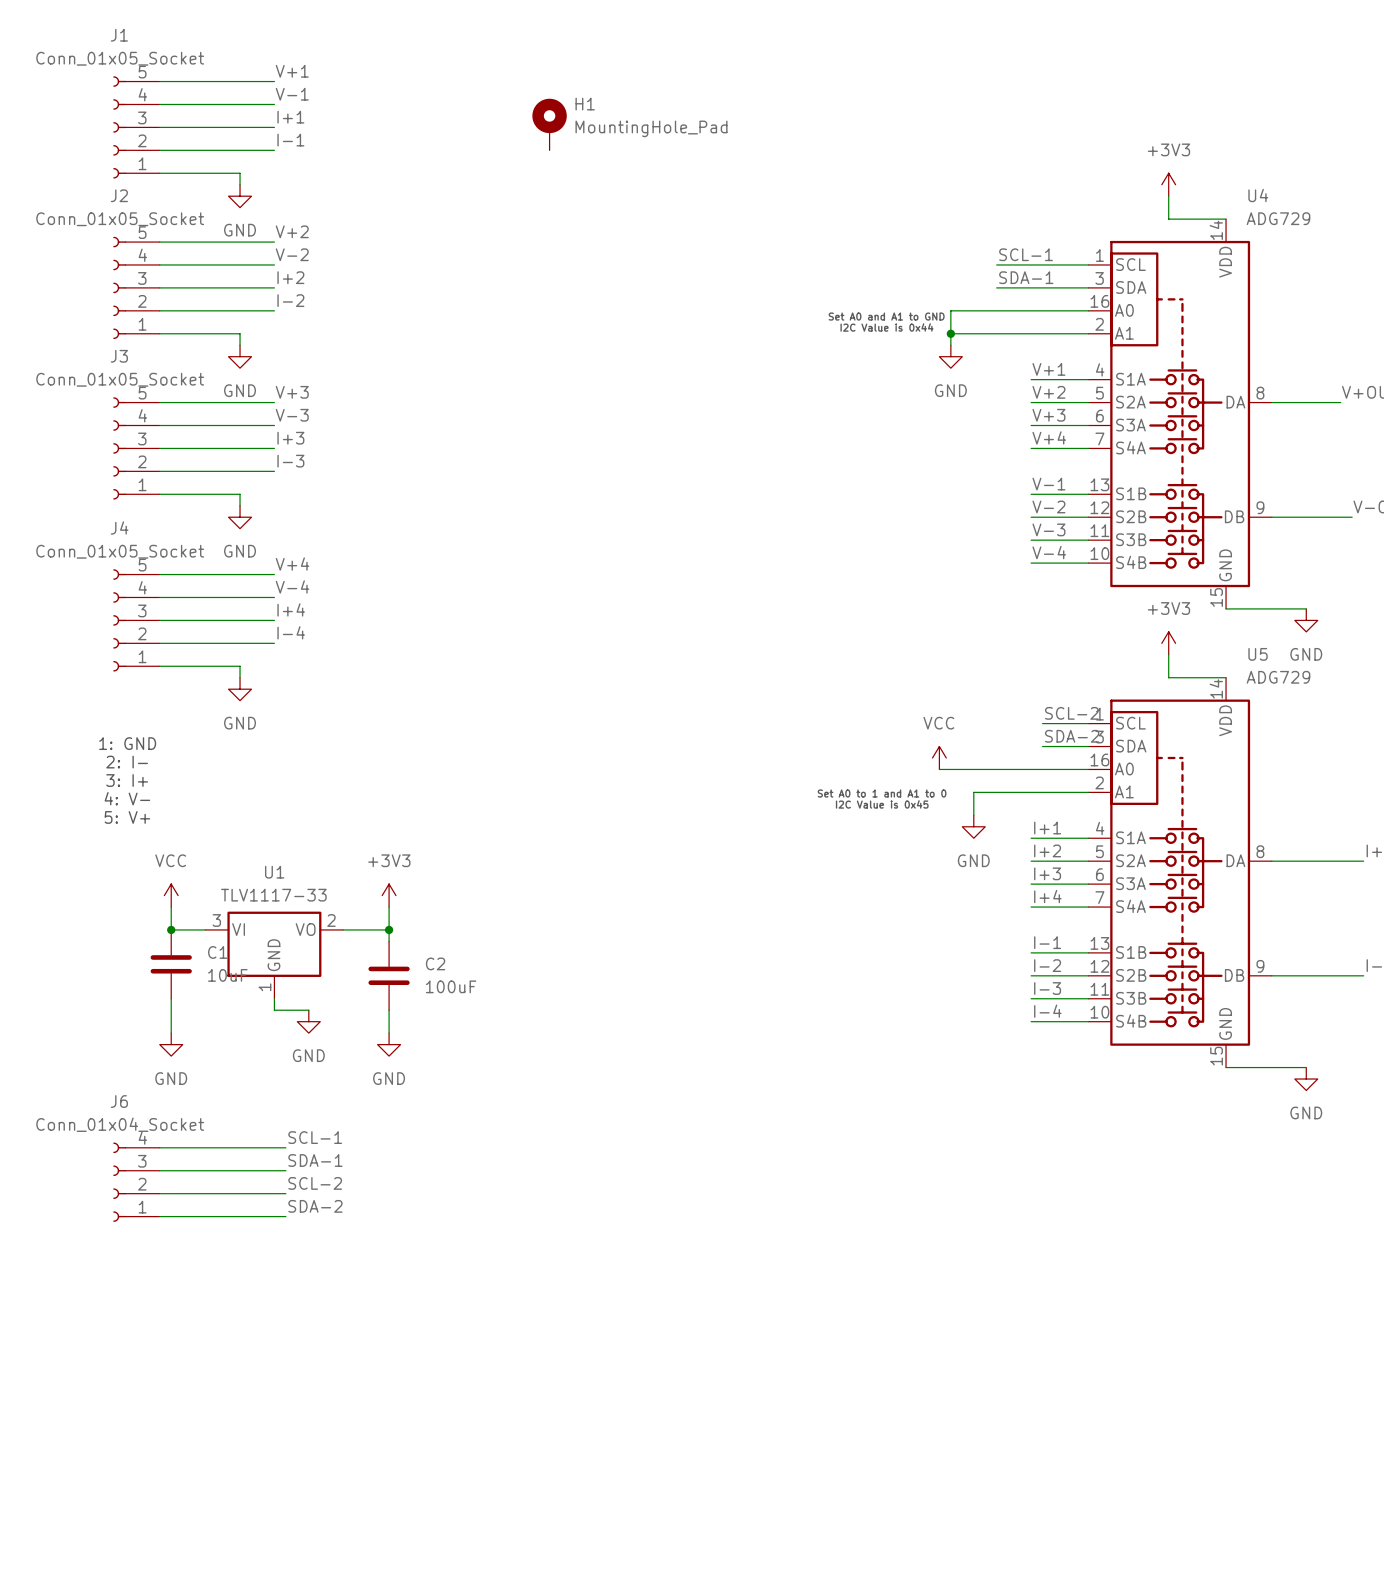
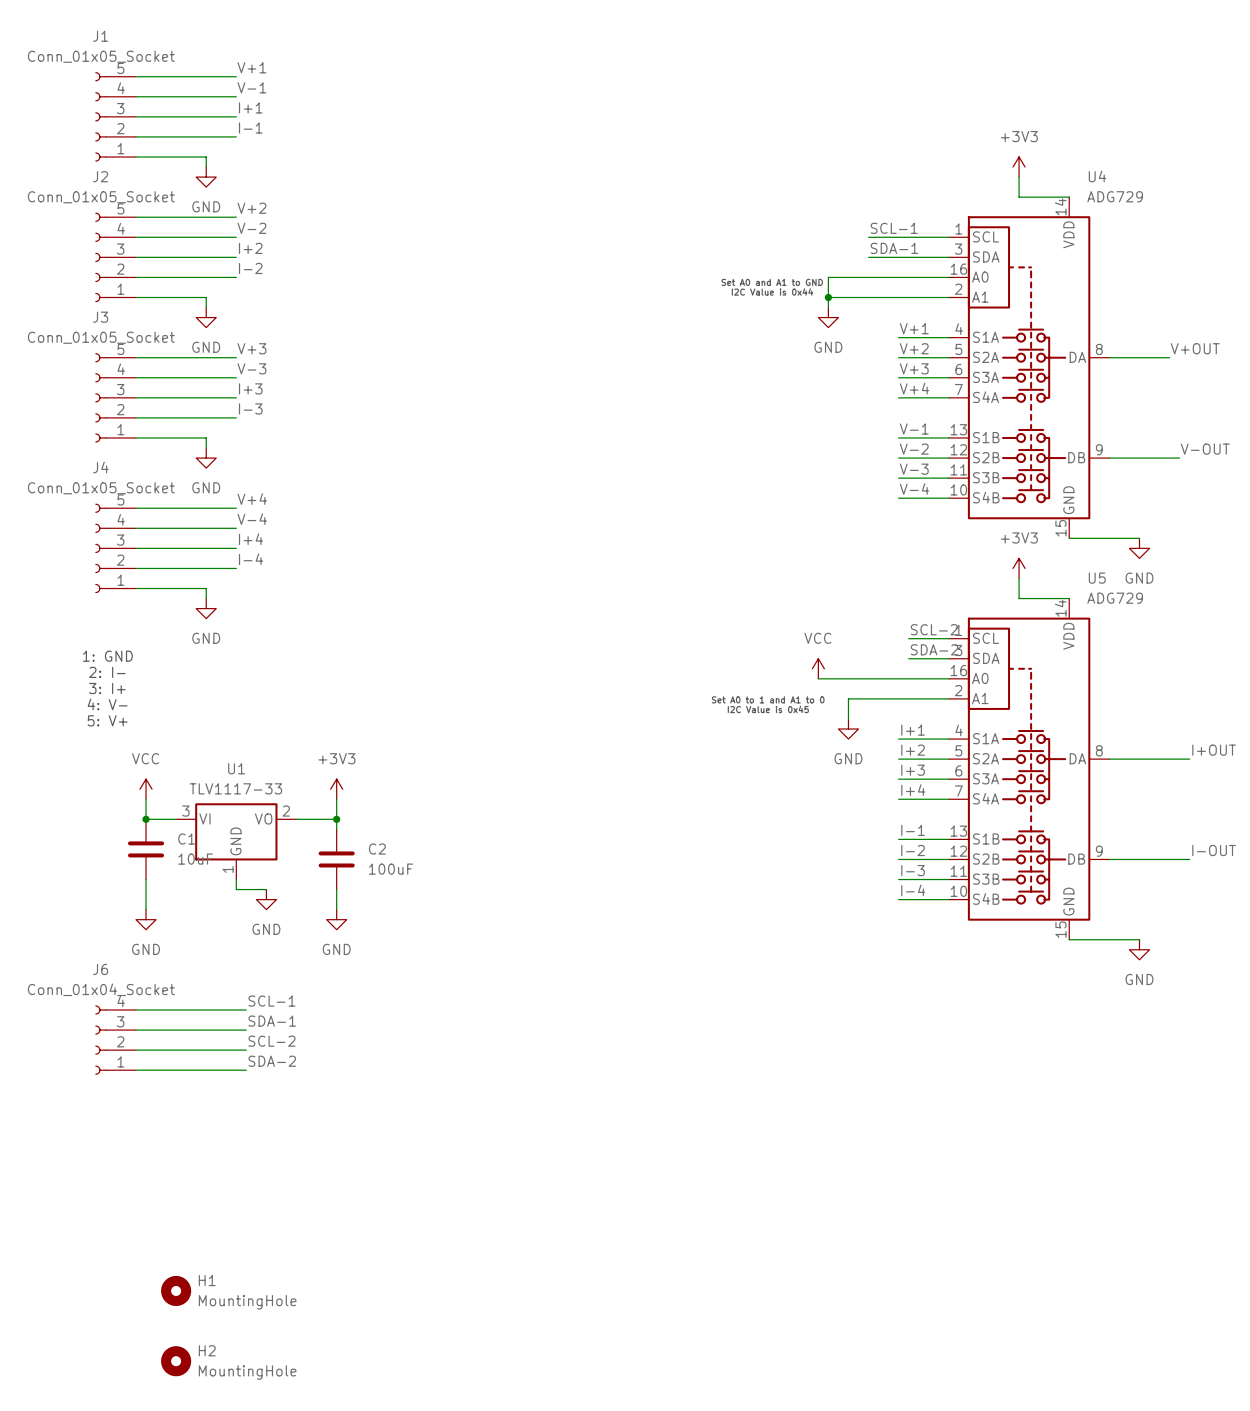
H1 symbol: [532, 98, 567, 151] -> [161, 1275, 192, 1307]
H1 value: MountingHole_Pad (651, 128) -> MountingHole (247, 1302)
H2: none -> MountingHole (176, 1361)

